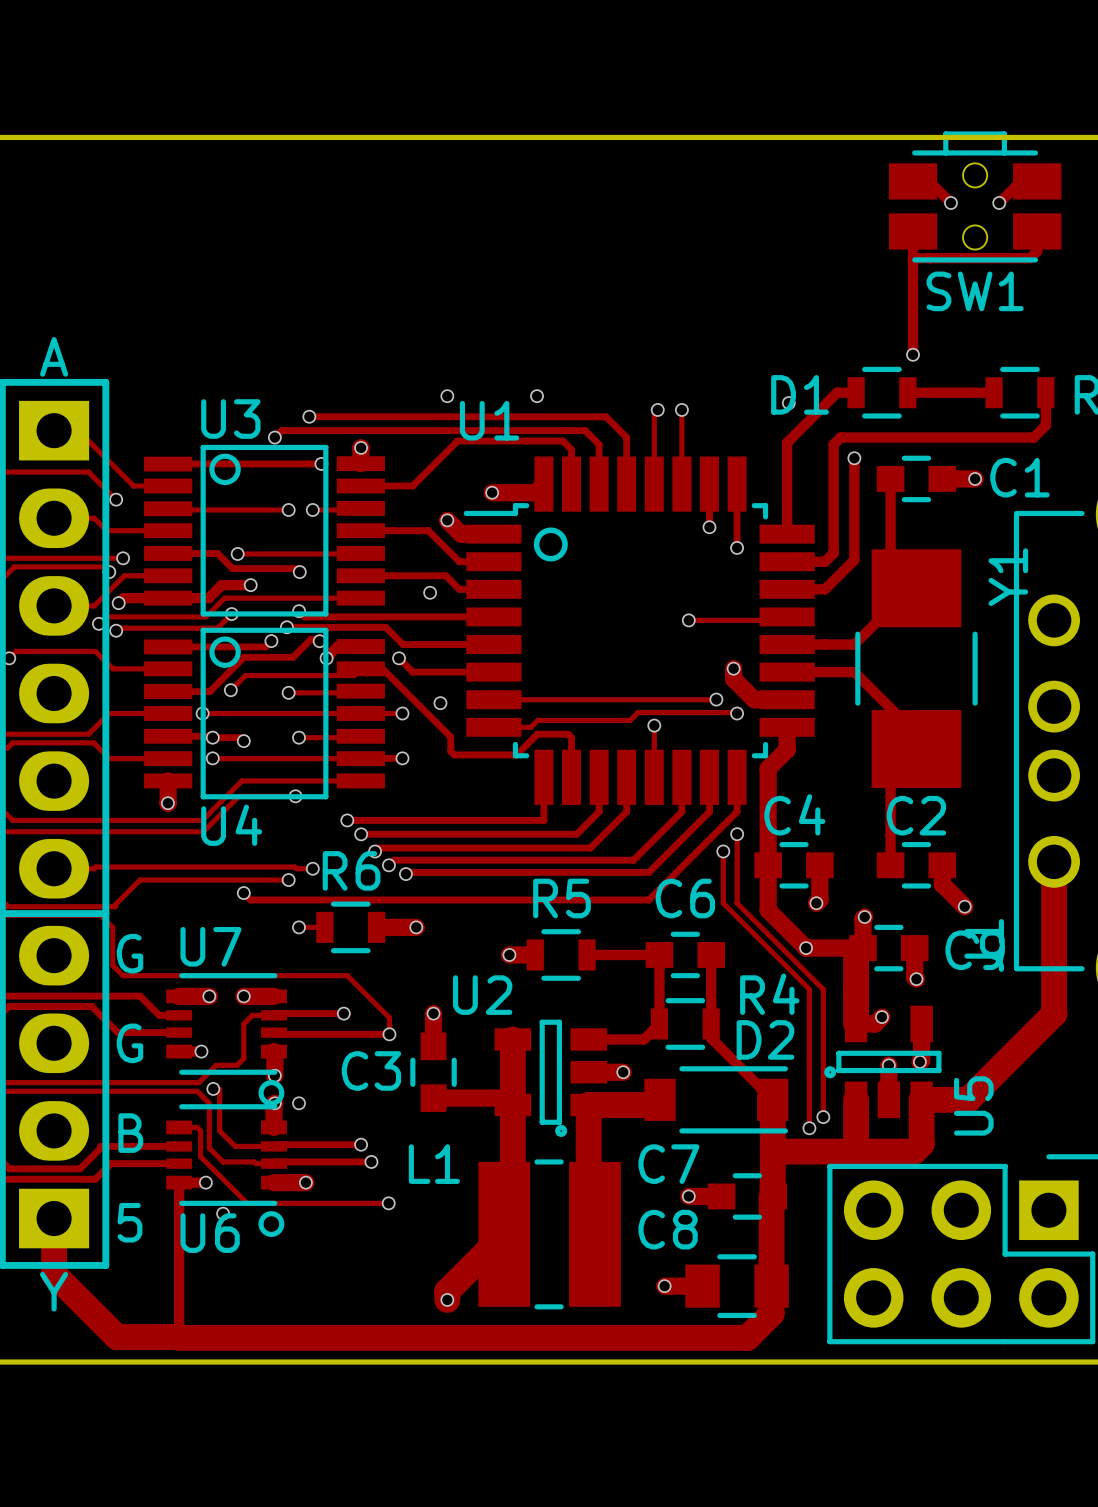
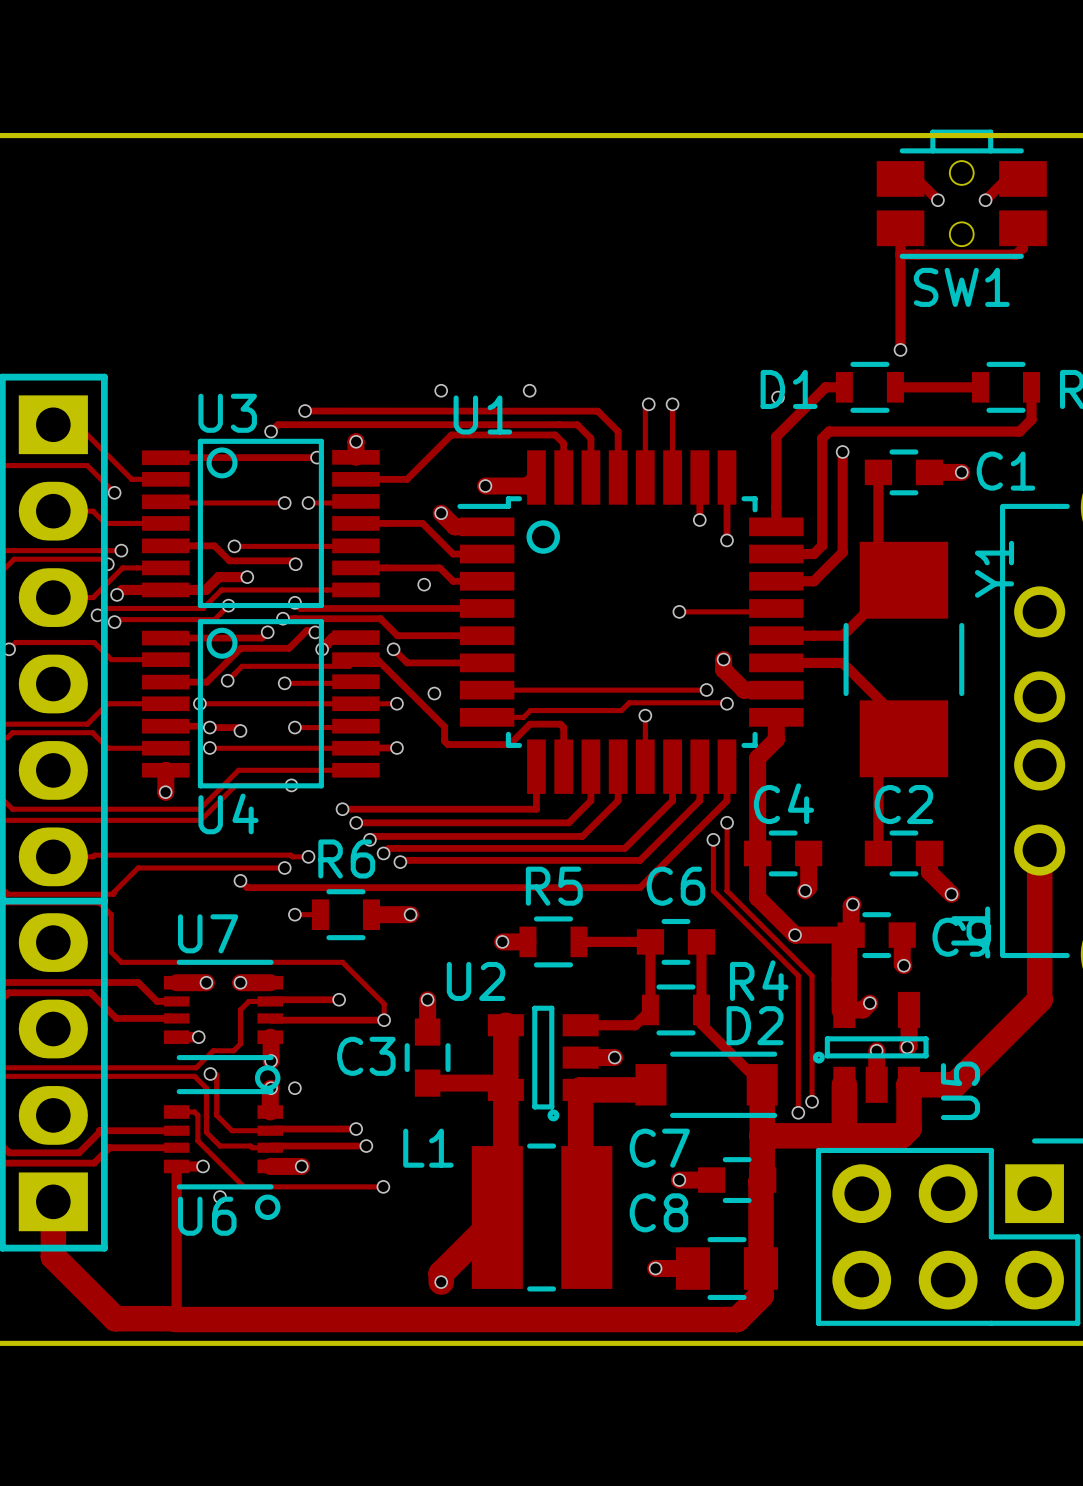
text: A (54, 356) -> none
text: G (129, 953) -> none
text: G (129, 1043) -> none
text: B (130, 1133) -> none
text: 5 (129, 1222) -> none
text: Y (54, 1291) -> none

